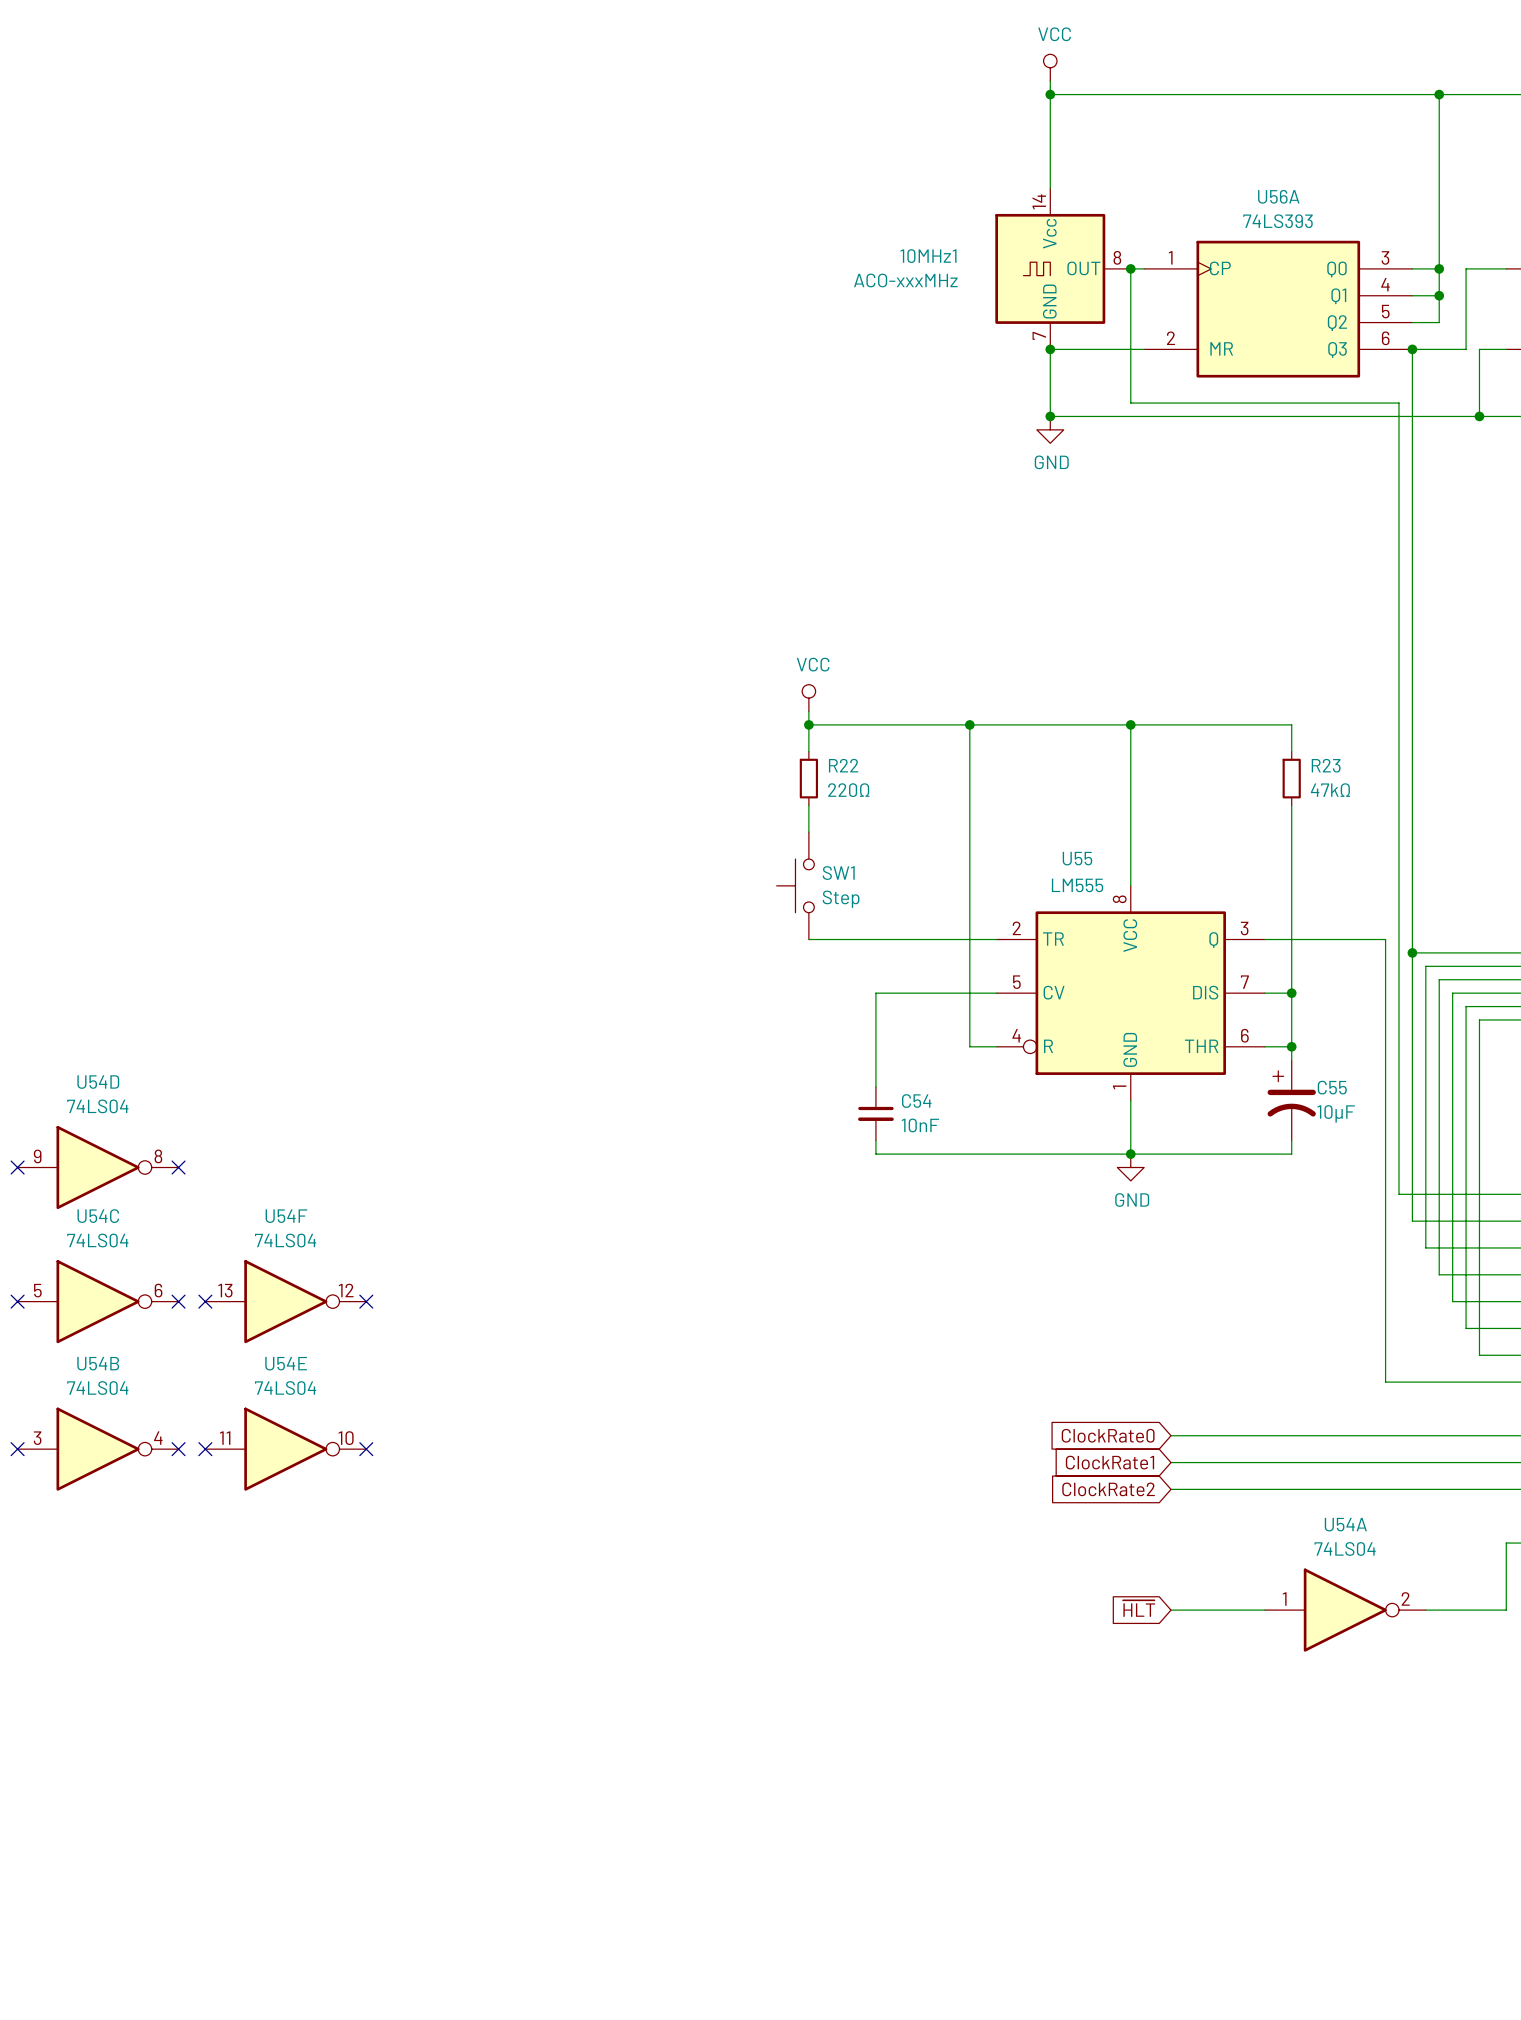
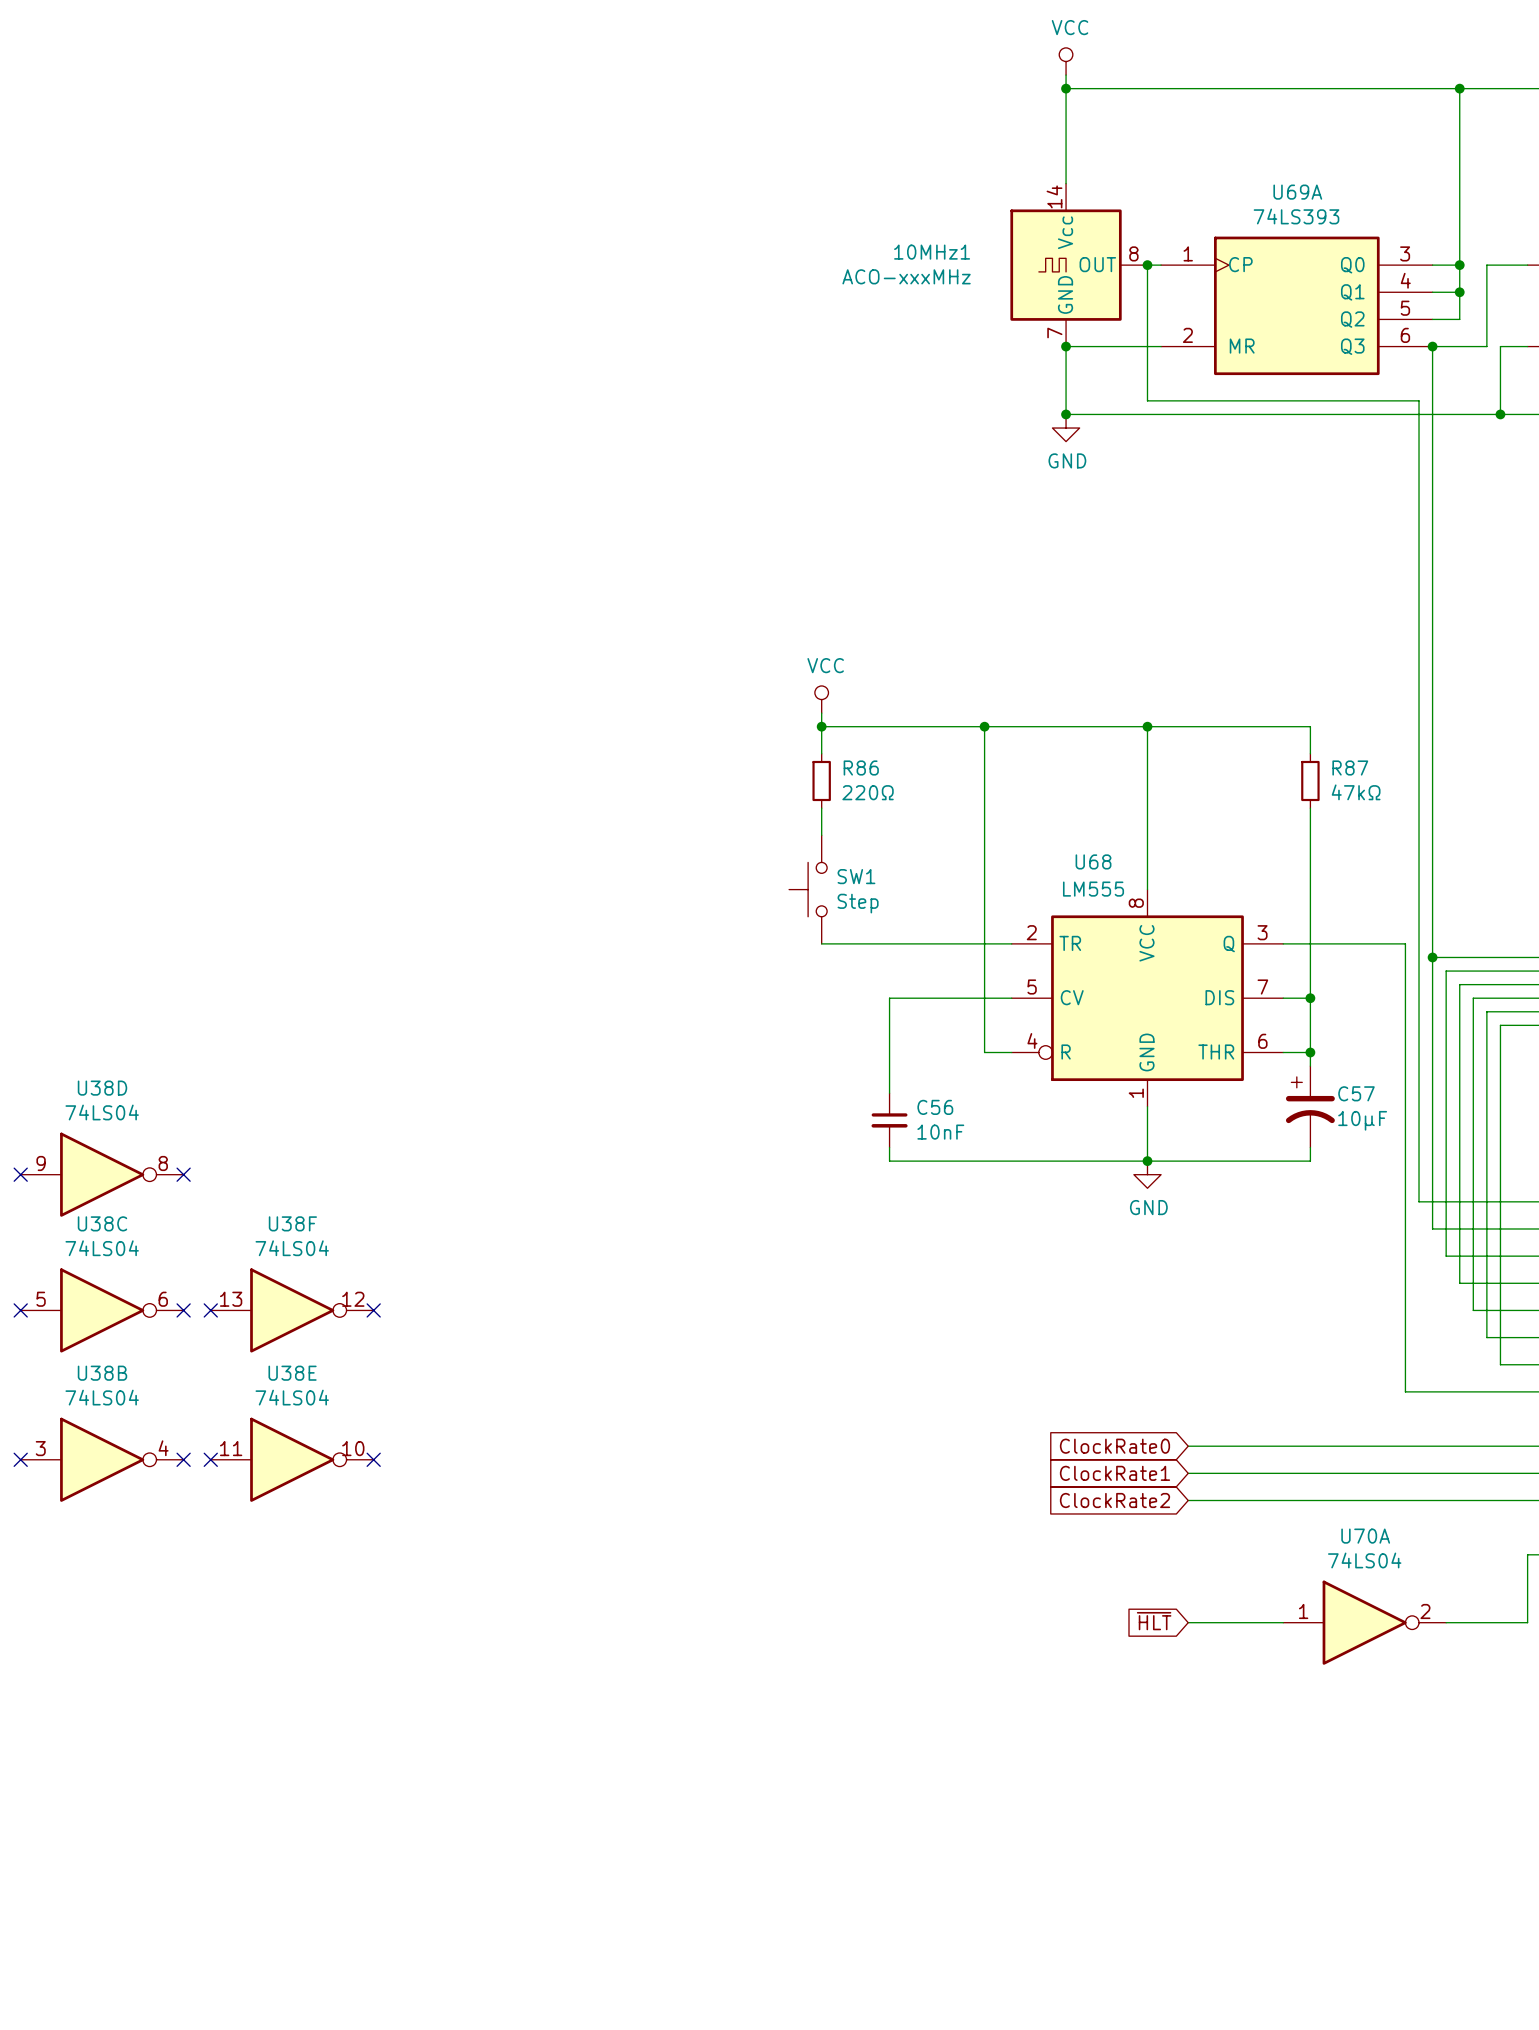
U56A name: U56A (1278, 196) -> U69A (1297, 192)
R22 name: R22 (843, 765) -> R86 (861, 767)
R23 name: R23 (1326, 765) -> R87 (1350, 767)
U55 name: U55 (1077, 858) -> U68 (1093, 861)
U54D name: U54D (98, 1082) -> U38D (102, 1088)
C55 name: C55 (1332, 1087) -> C57 (1356, 1093)
C54 name: C54 (916, 1101) -> C56 (935, 1107)
U54C name: U54C (98, 1216) -> U38C (102, 1223)
U54F name: U54F (286, 1216) -> U38F (292, 1223)
U54B name: U54B (98, 1363) -> U38B (102, 1373)
U54E name: U54E (286, 1363) -> U38E (292, 1373)
U54A name: U54A (1345, 1524) -> U70A (1365, 1536)

